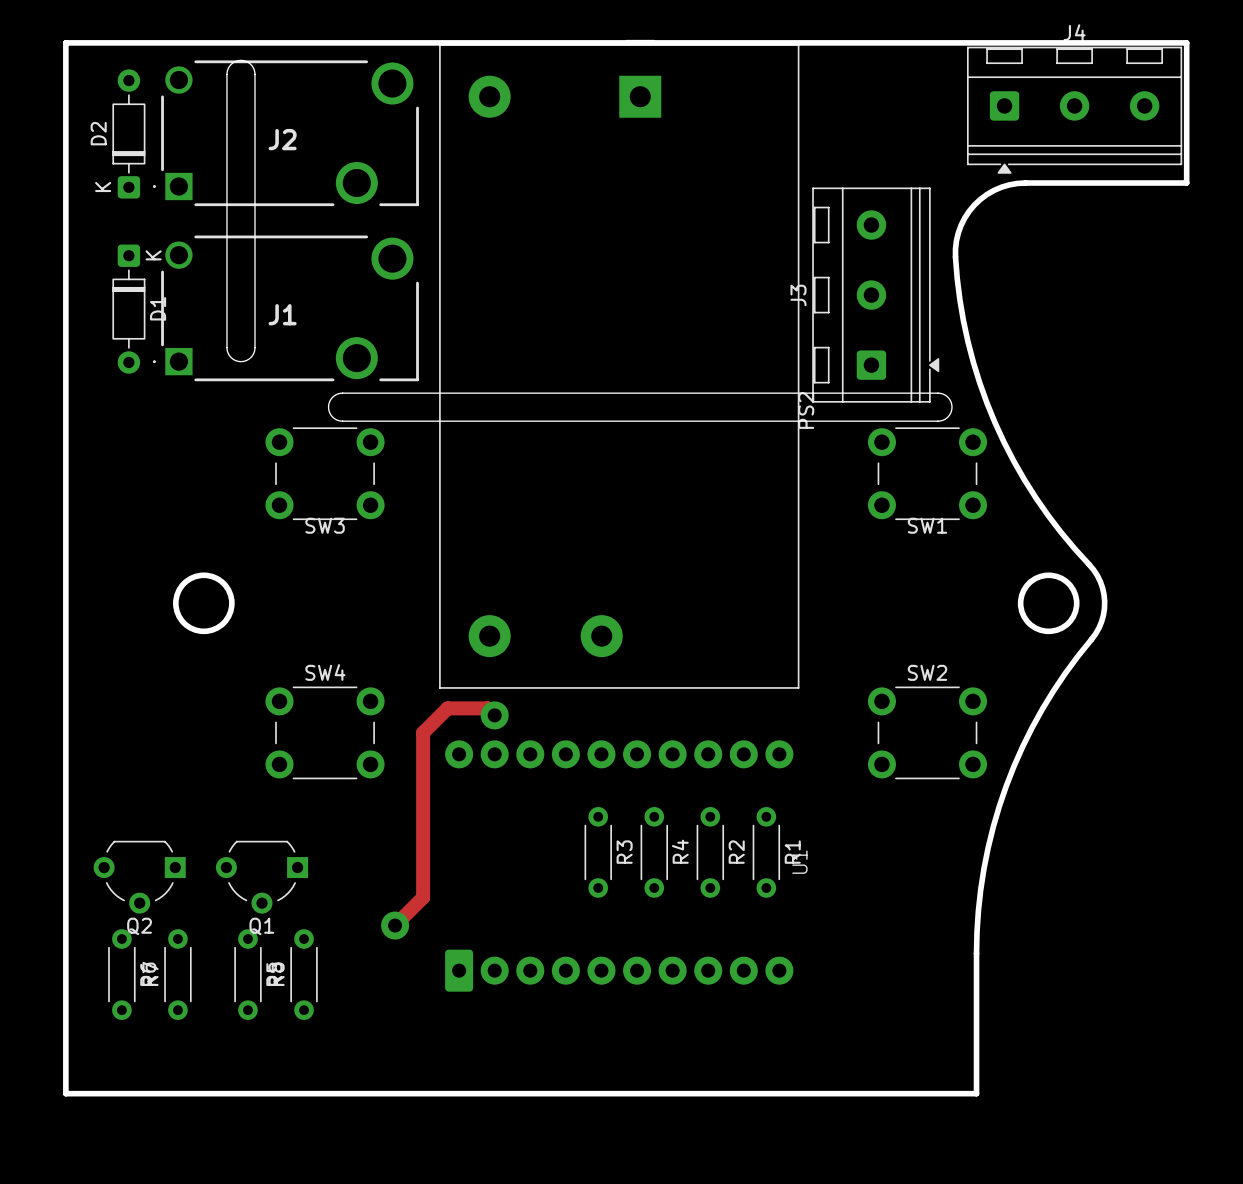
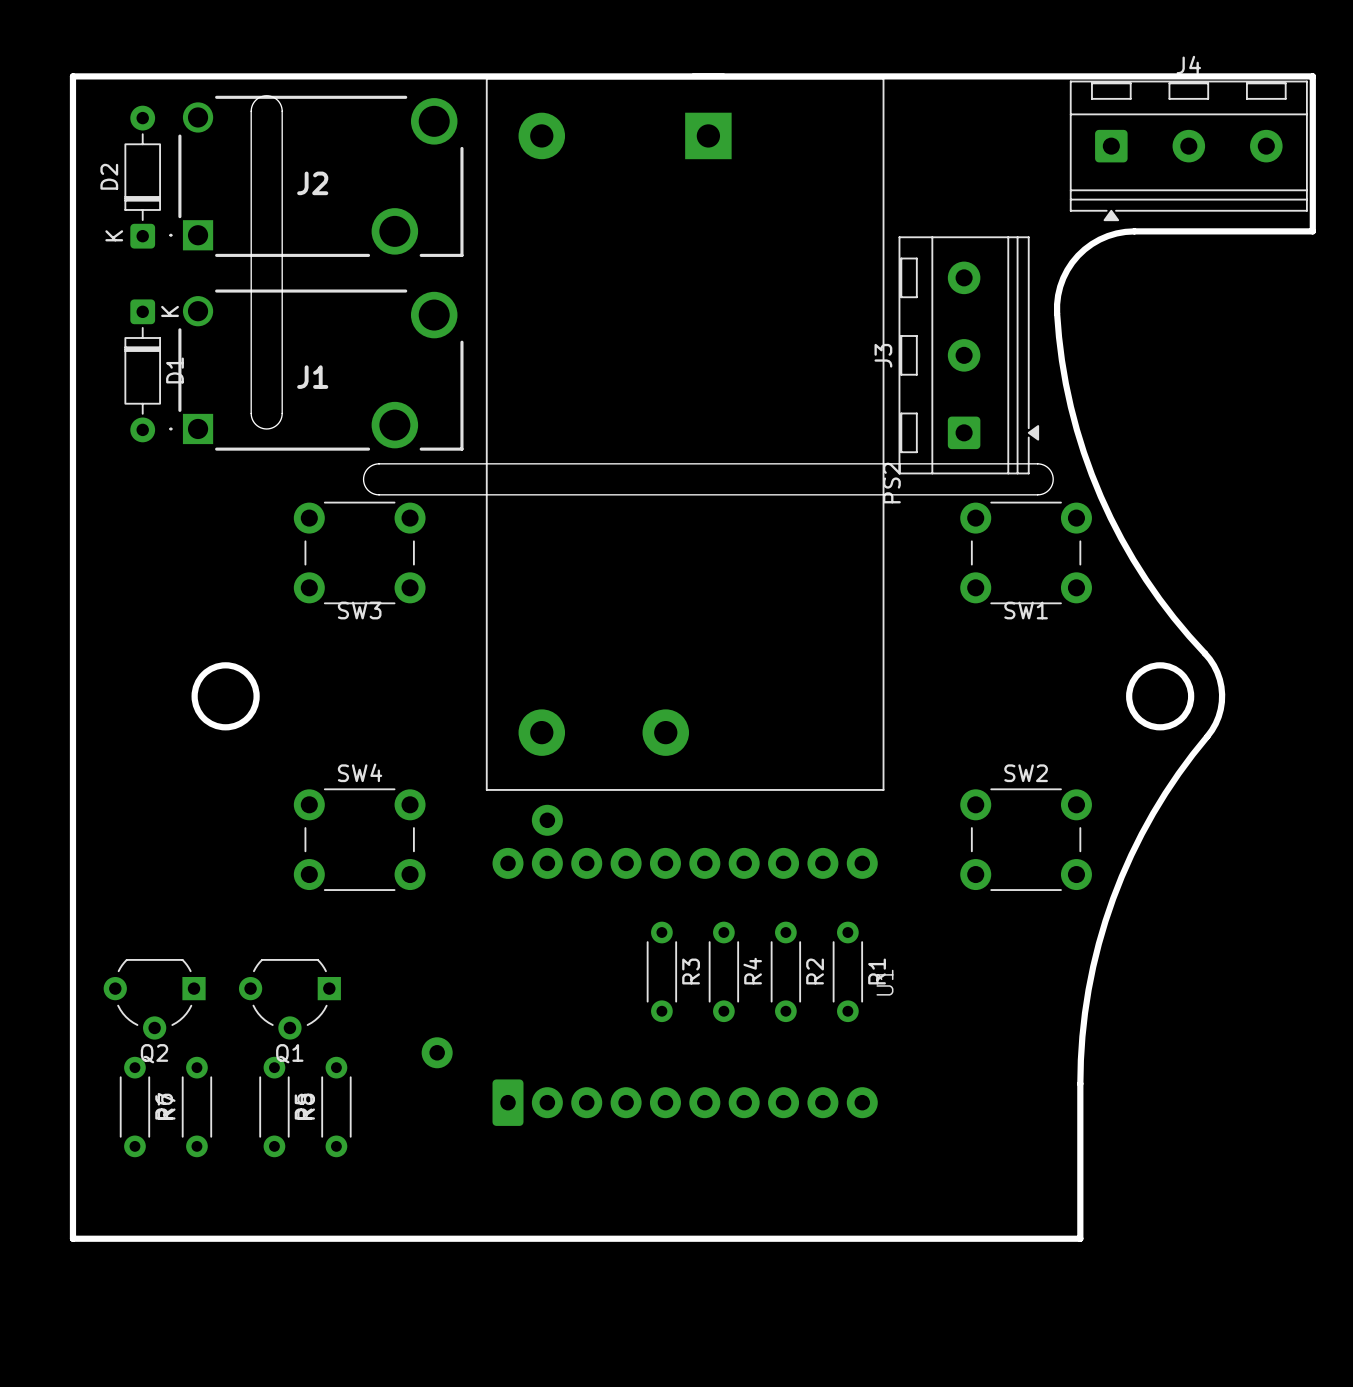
track: (494, 715) (487, 708) (447, 708) (423, 732) (423, 897) (395, 925) -> none

